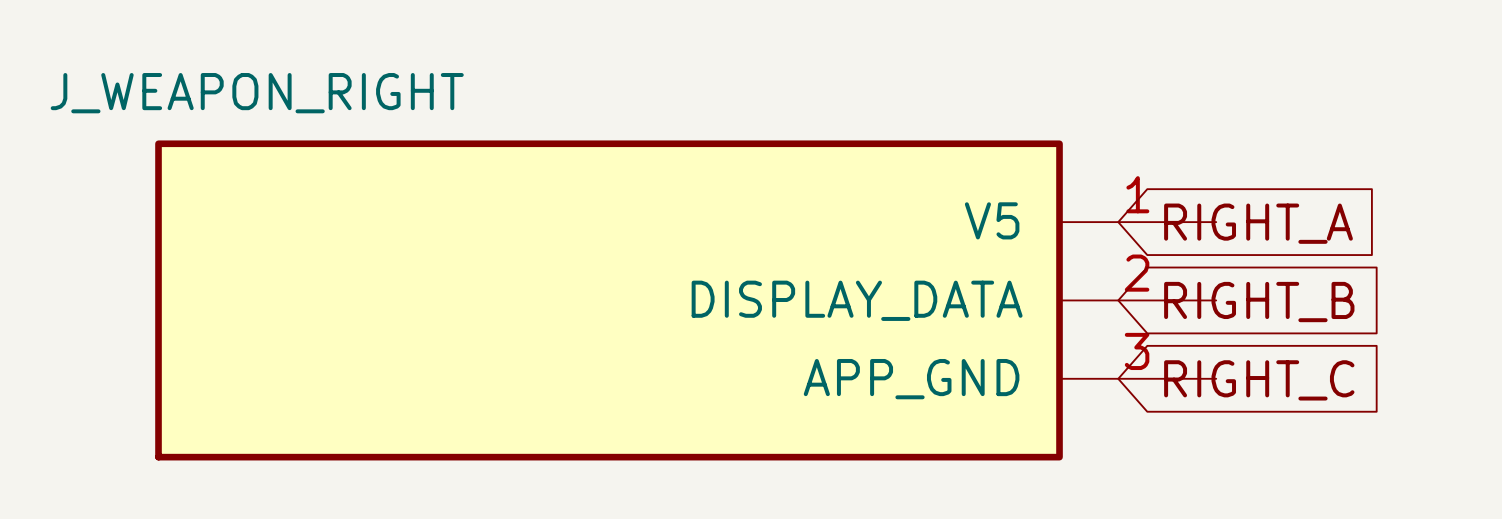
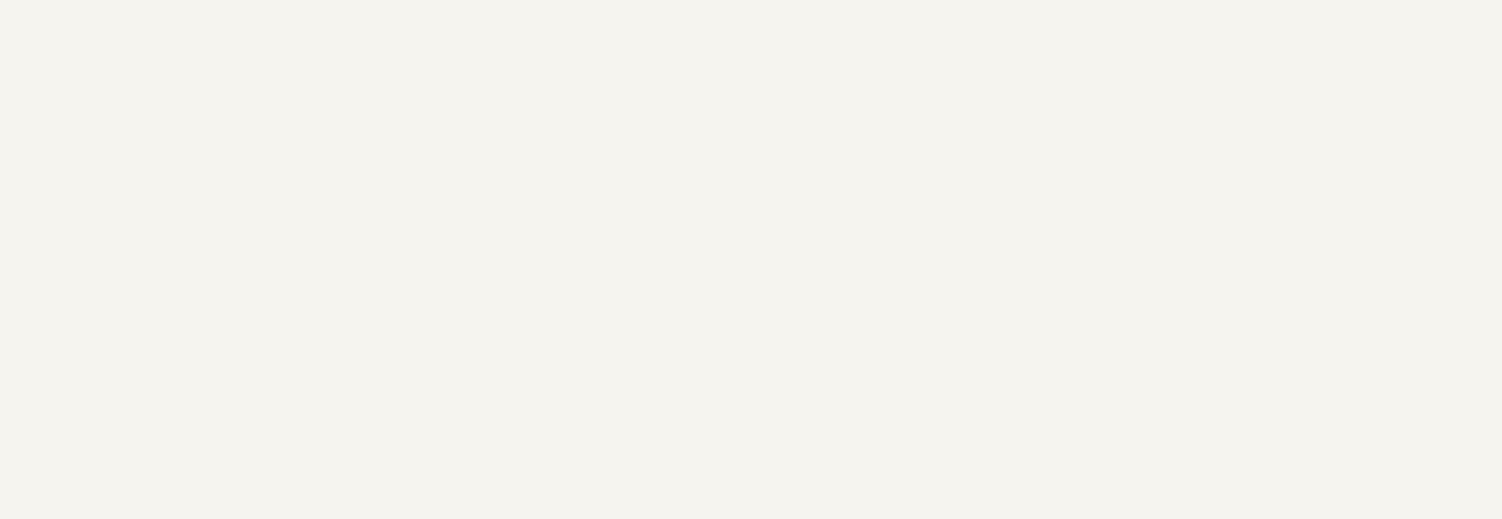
global label: RIGHT_A (1258, 223) -> none
J_WEAPON_RIGHT: (685, 300) -> none
global label: RIGHT_B (1259, 302) -> none
global label: RIGHT_C (1259, 380) -> none

